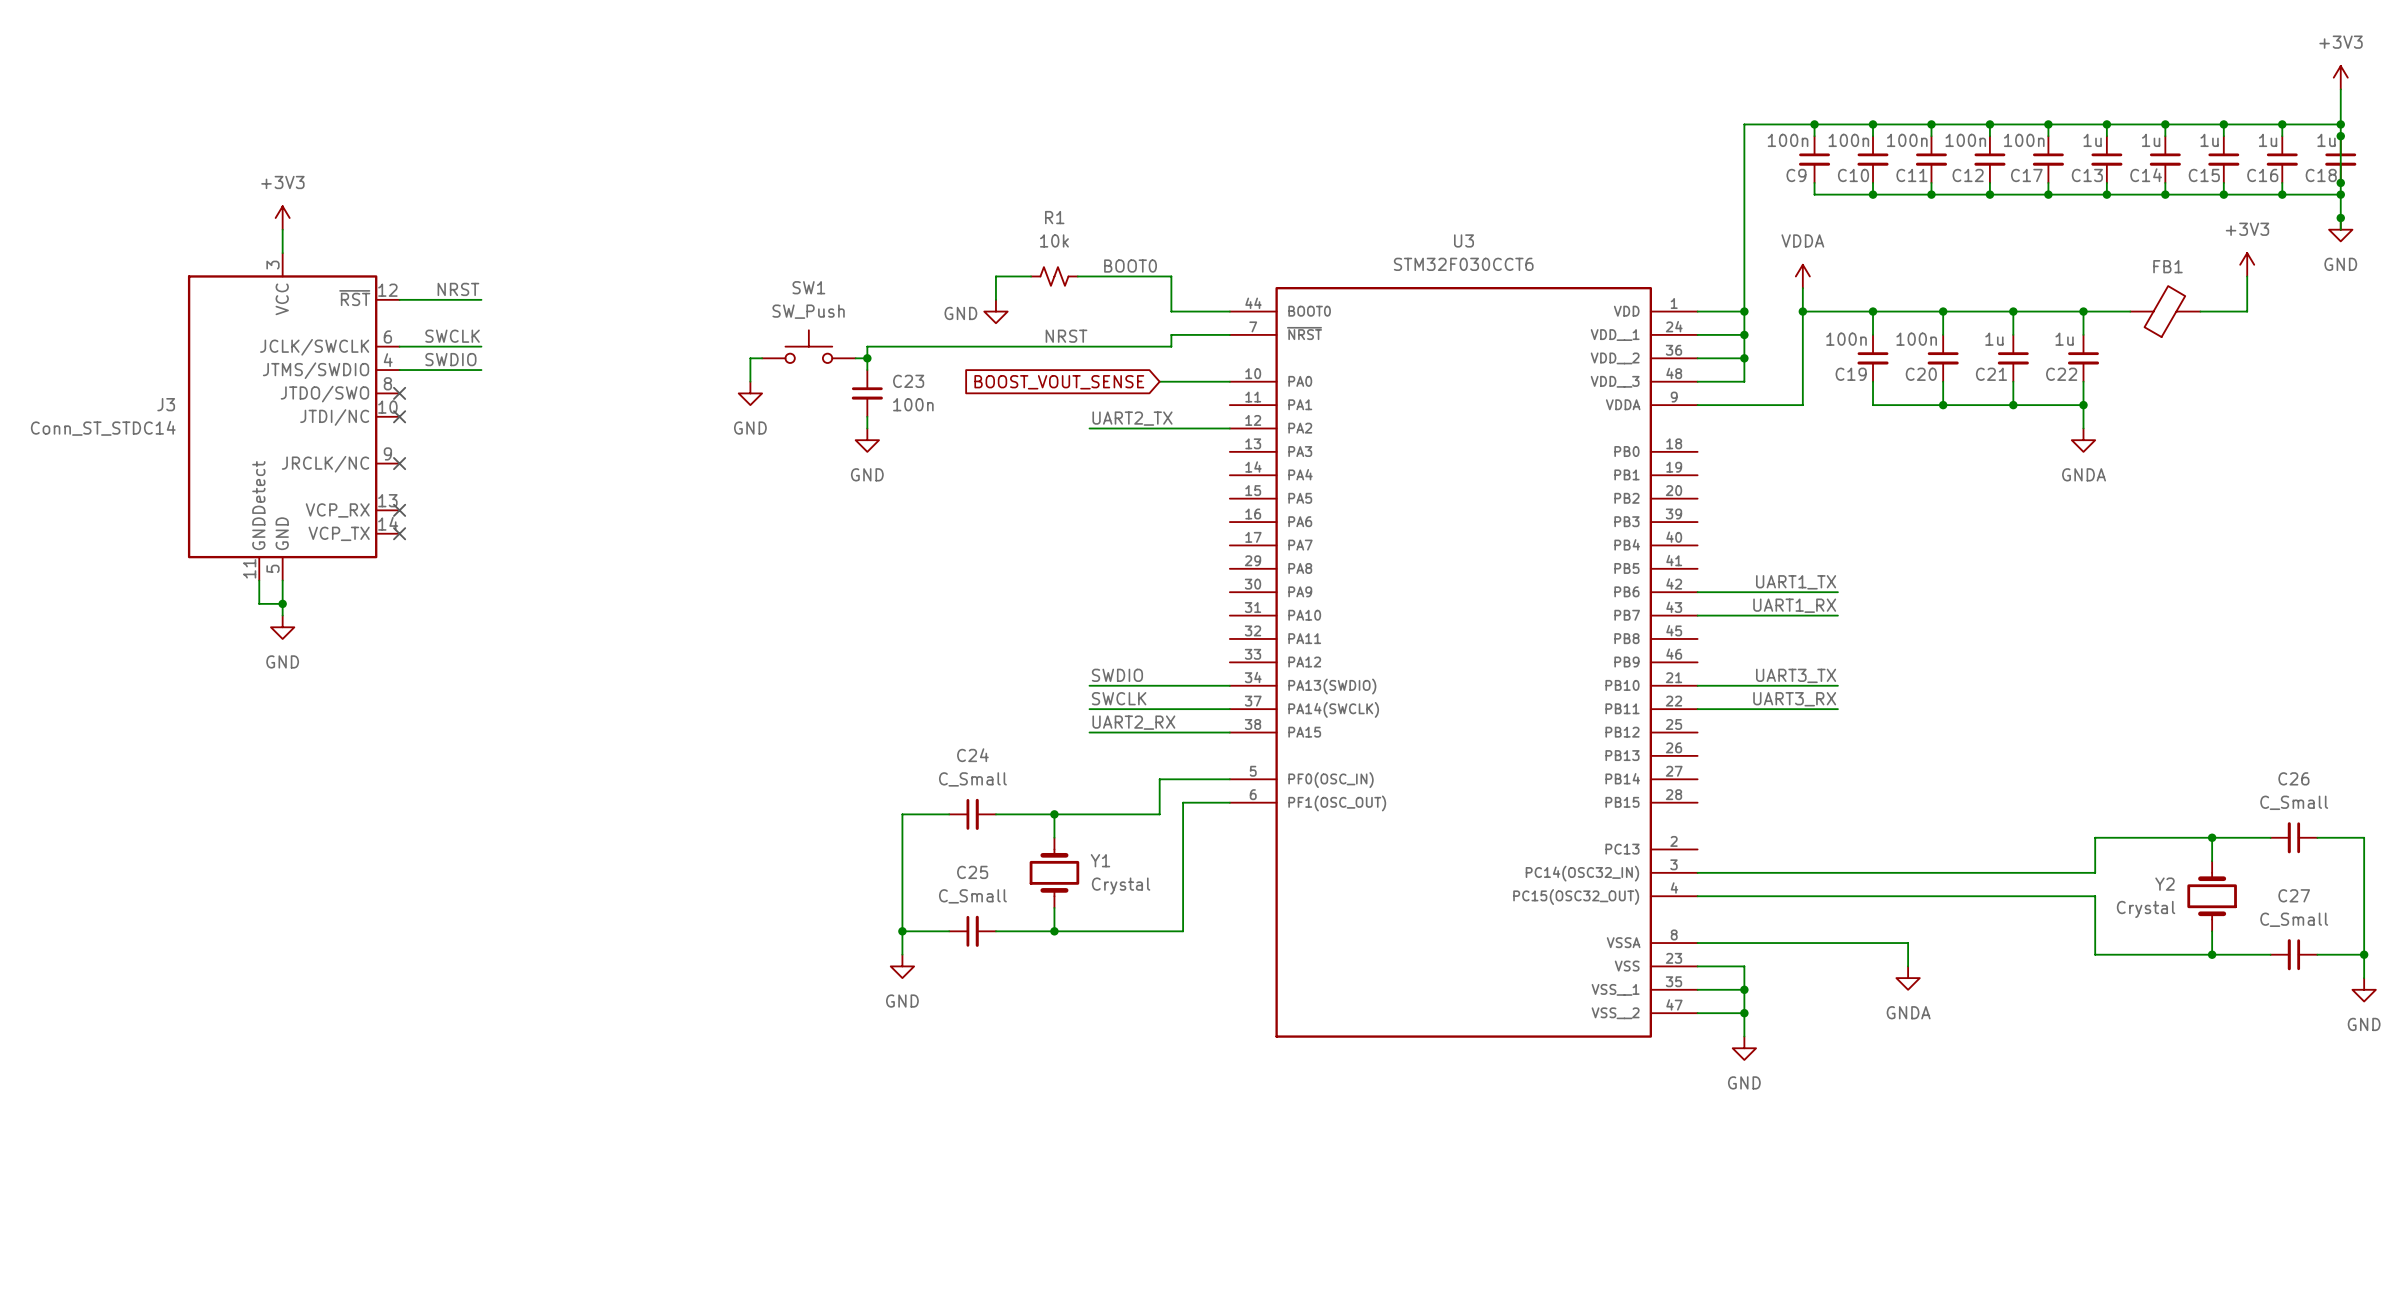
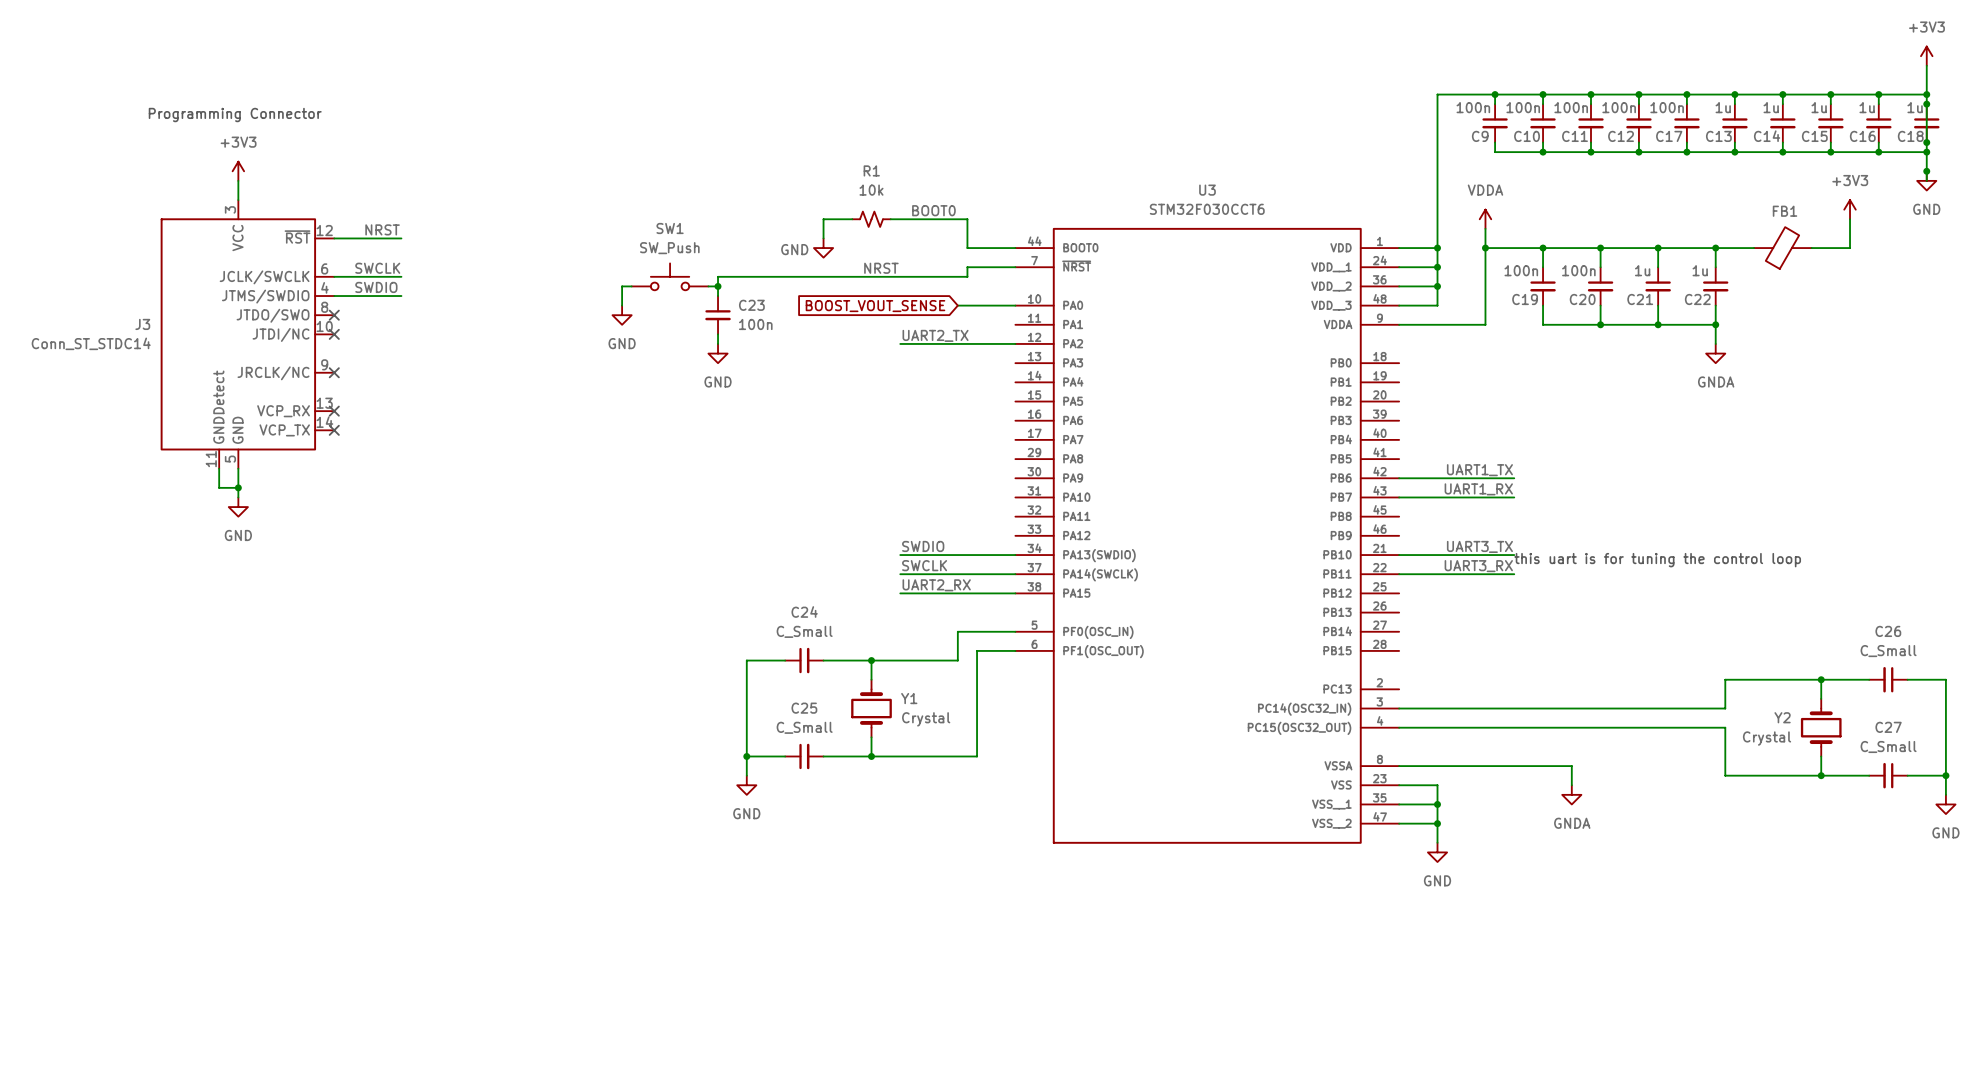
text: none -> Programming Connector (235, 115)
text: none -> this uart is for tuning the control loop (1657, 560)

